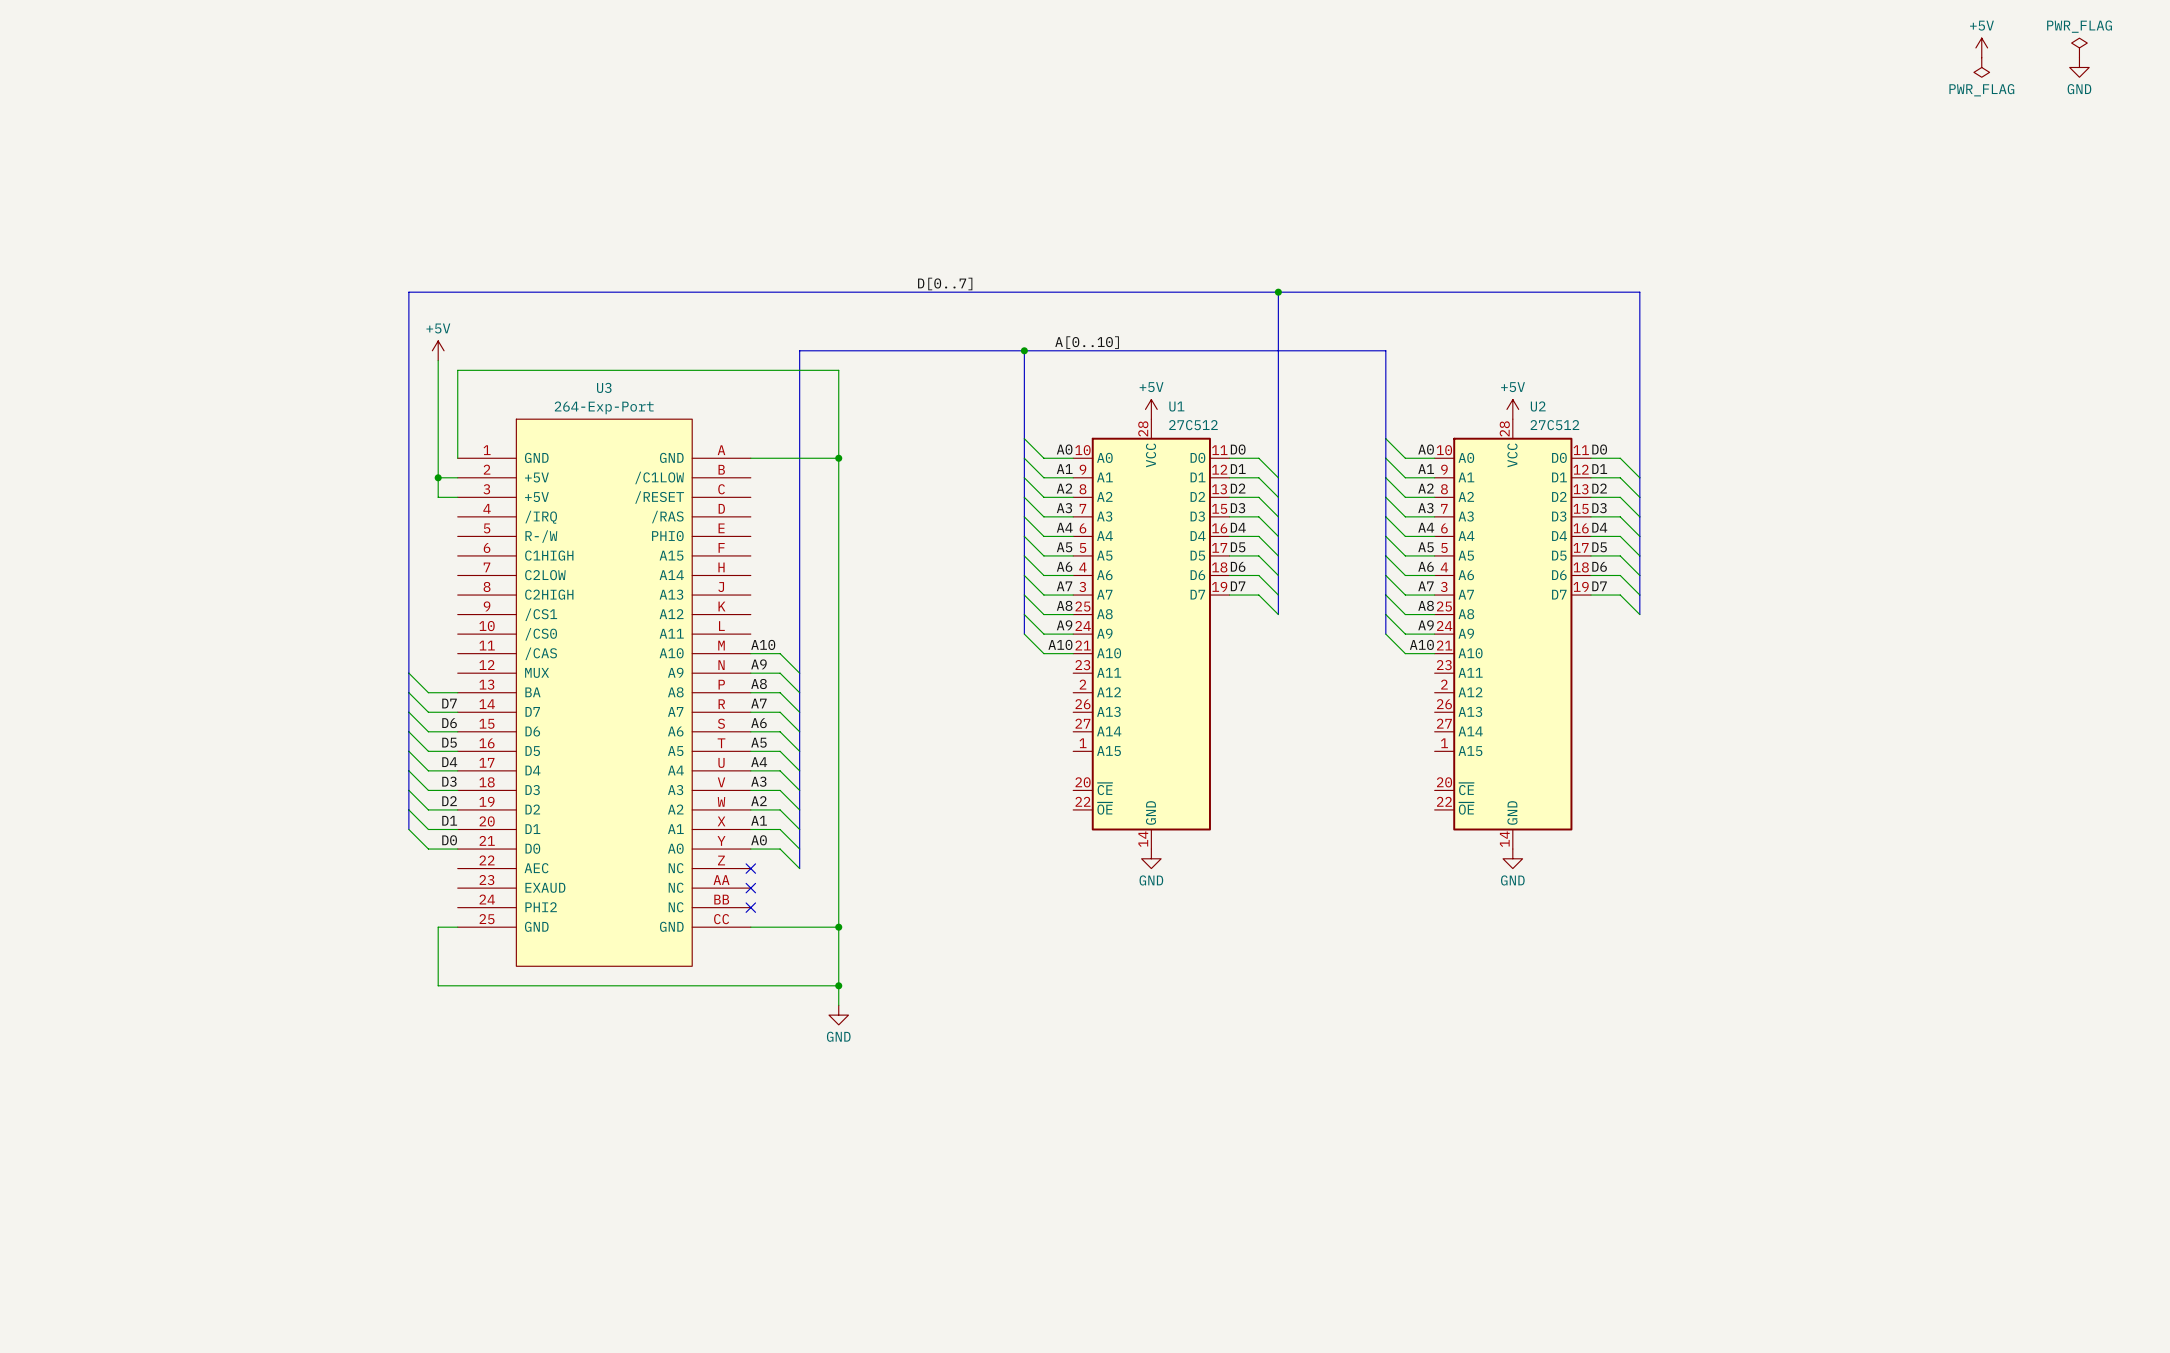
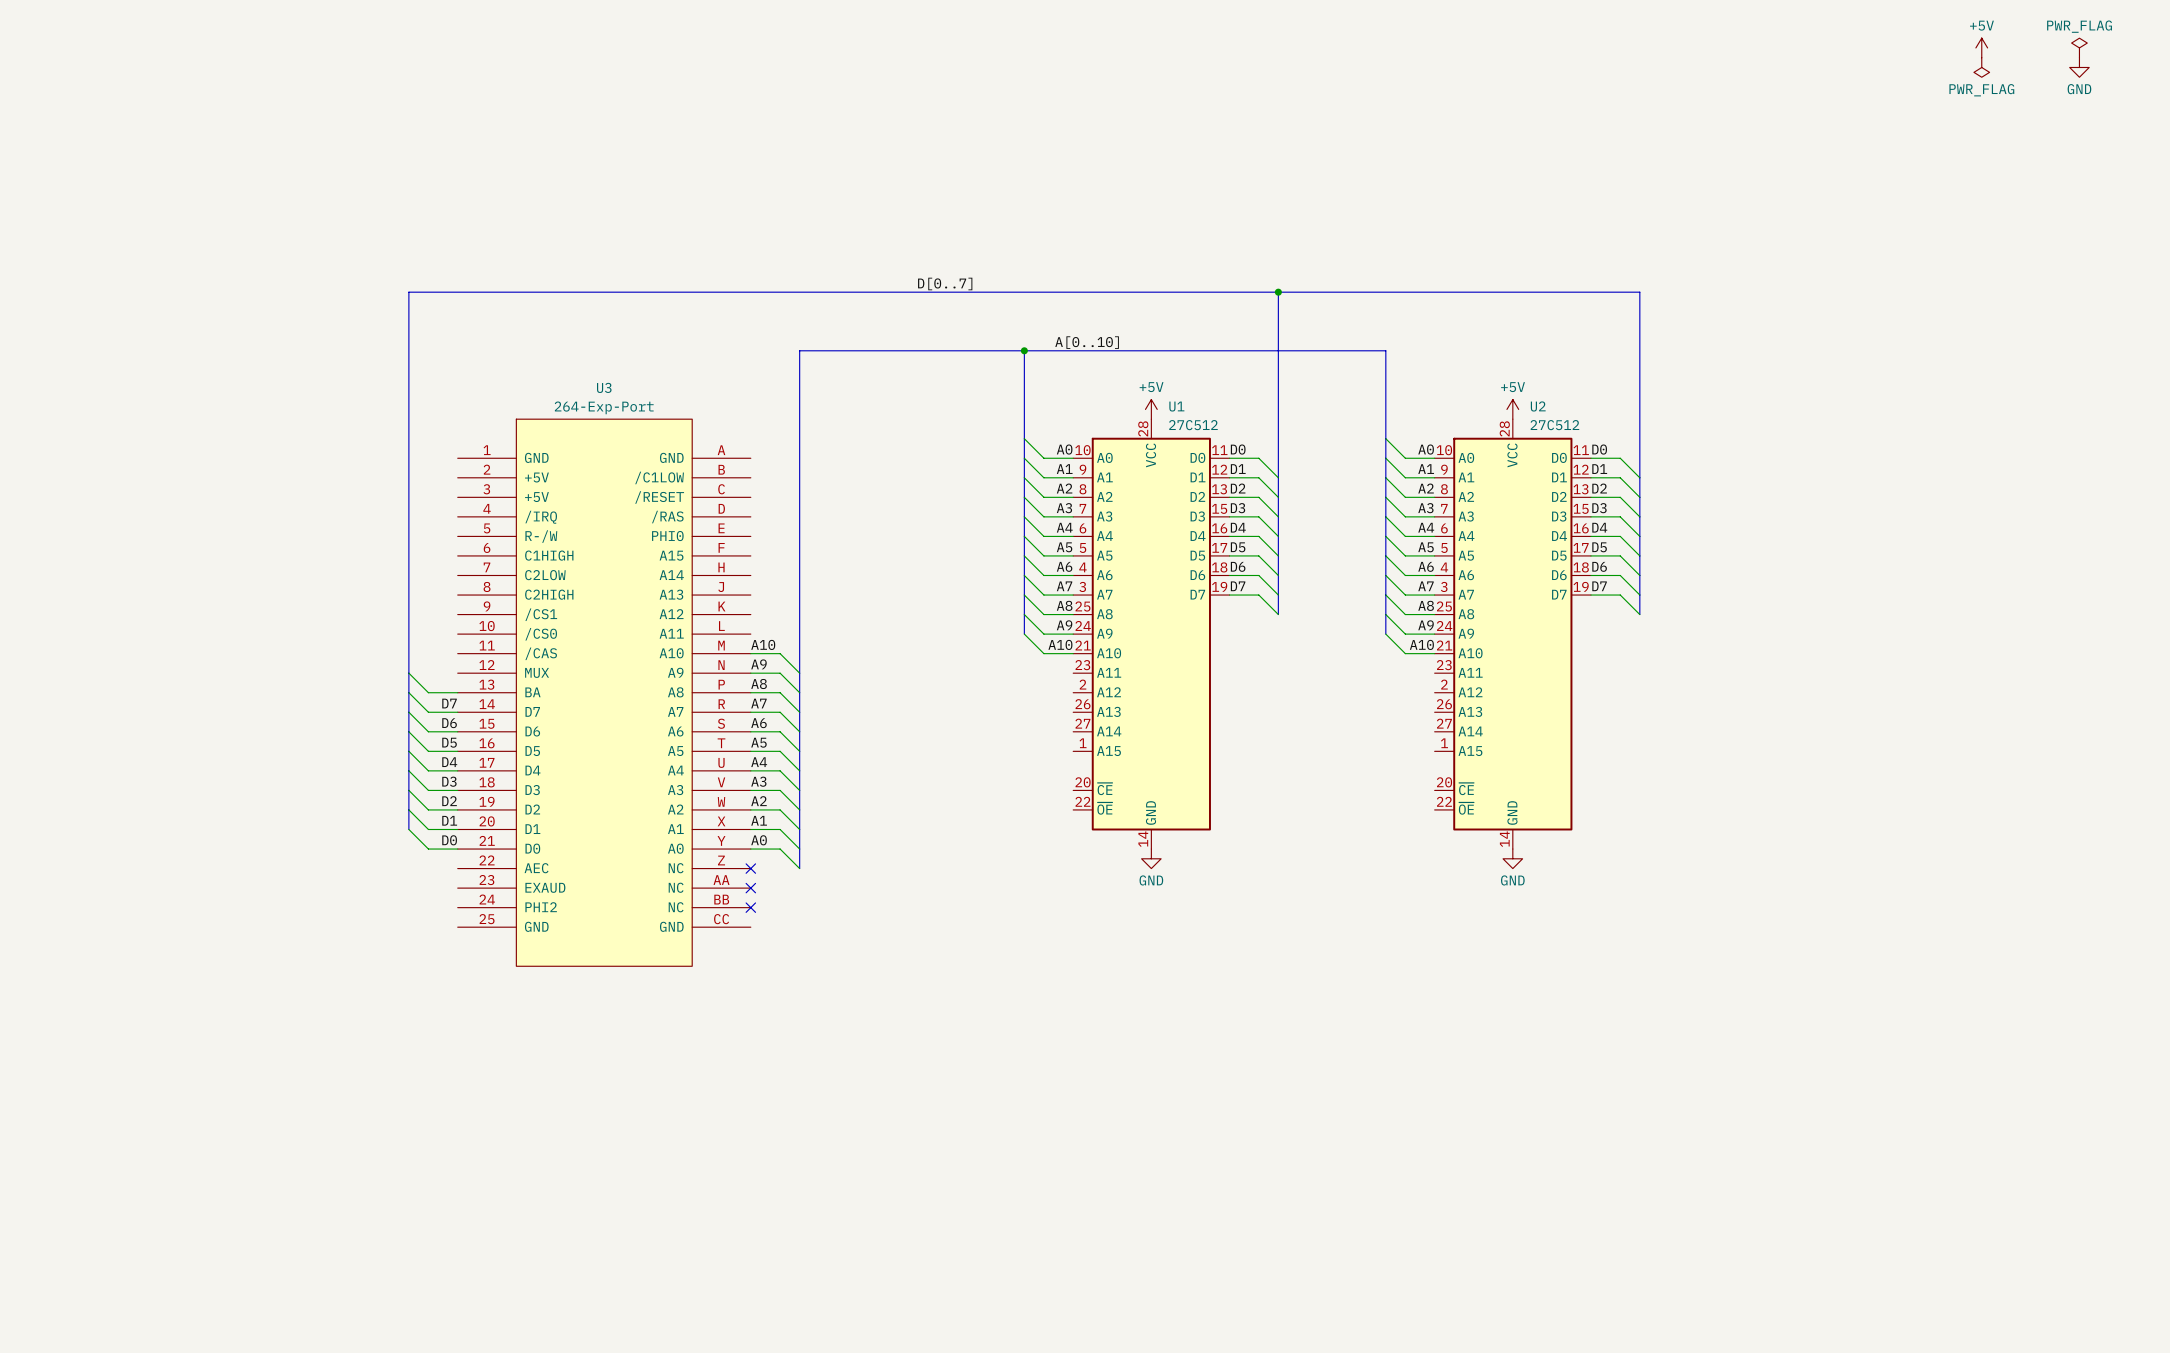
power symbol: +5V (438, 350) -> none
wire: (438, 360) (438, 497) (457, 497) -> none
wire: (457, 458) (457, 370) (838, 370) (838, 1005) -> none
wire: (750, 458) (838, 458) -> none
junction: (838, 458) -> none
wire: (438, 477) (457, 477) -> none
junction: (438, 477) -> none
wire: (457, 927) (438, 927) (438, 985) (838, 985) -> none
wire: (750, 927) (838, 927) -> none
junction: (838, 927) -> none
junction: (838, 985) -> none
power symbol: GND (838, 1015) -> none

